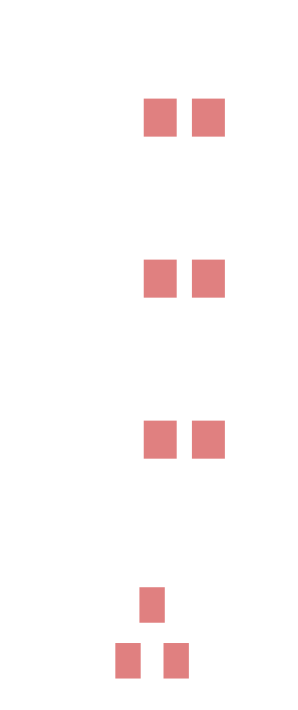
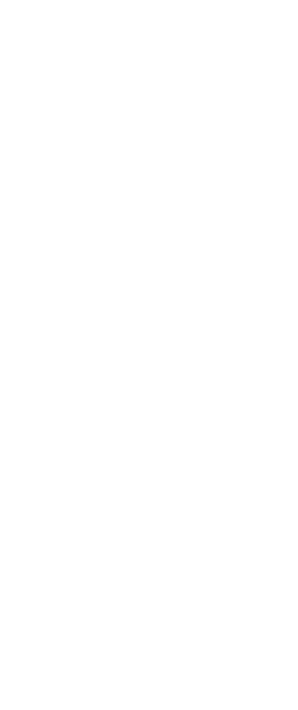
part: (184, 117) -> none
part: (184, 278) -> none
part: (184, 439) -> none
part: (152, 632) -> none

